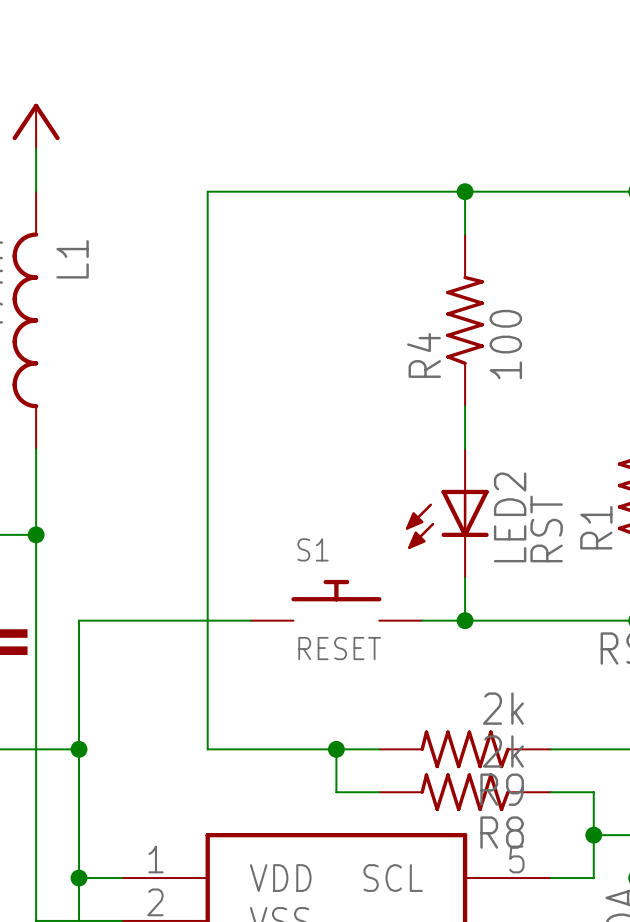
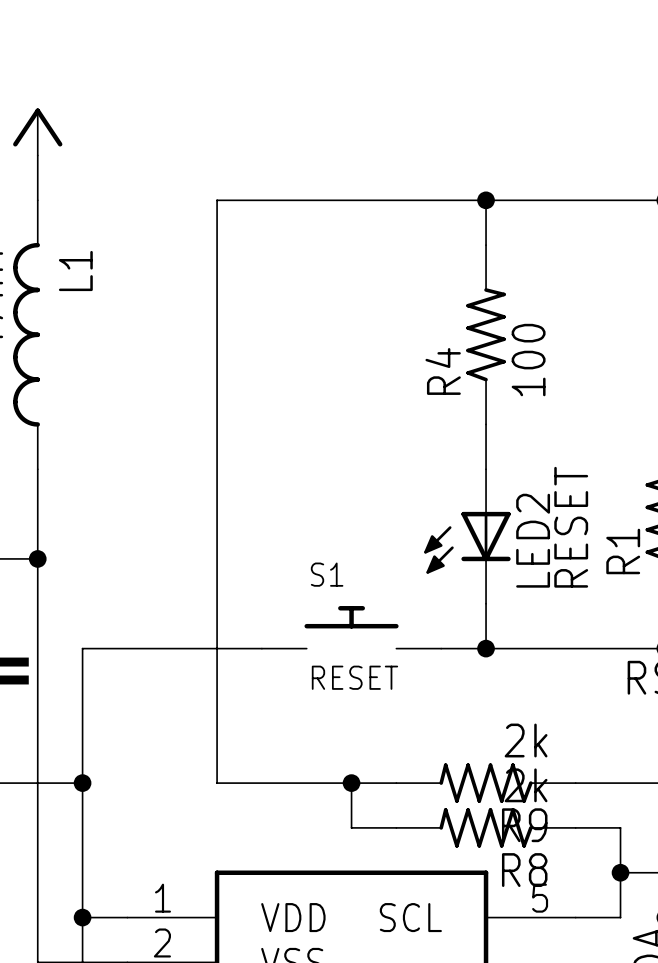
LED2 value: RST (546, 528) -> RESET (571, 527)

